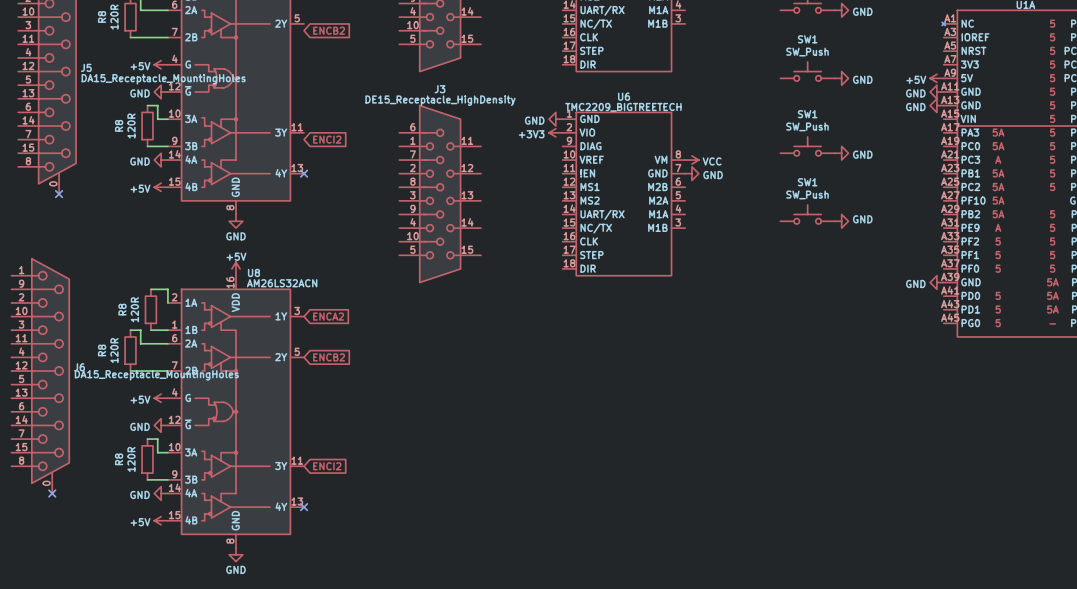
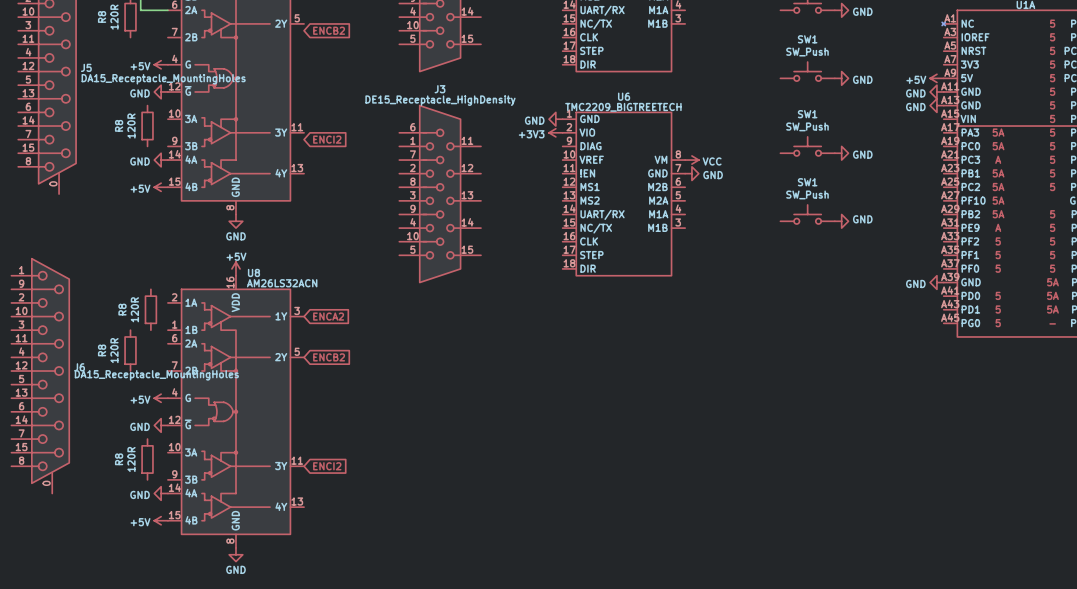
wire: (130, 37) (167, 37) -> none
wire: (147, 105) (157, 105) (157, 119) (167, 119) -> none
wire: (147, 146) (167, 146) -> none
no-connect mark: (304, 173) -> none
no-connect mark: (59, 194) -> none
wire: (150, 289) (167, 289) (167, 302) -> none
wire: (130, 330) (140, 330) (140, 343) (167, 343) -> none
wire: (150, 330) (167, 330) -> none
wire: (130, 371) (167, 371) -> none
wire: (147, 439) (157, 439) (157, 452) (167, 452) -> none
wire: (147, 479) (167, 479) -> none
no-connect mark: (52, 493) -> none
no-connect mark: (304, 507) -> none

